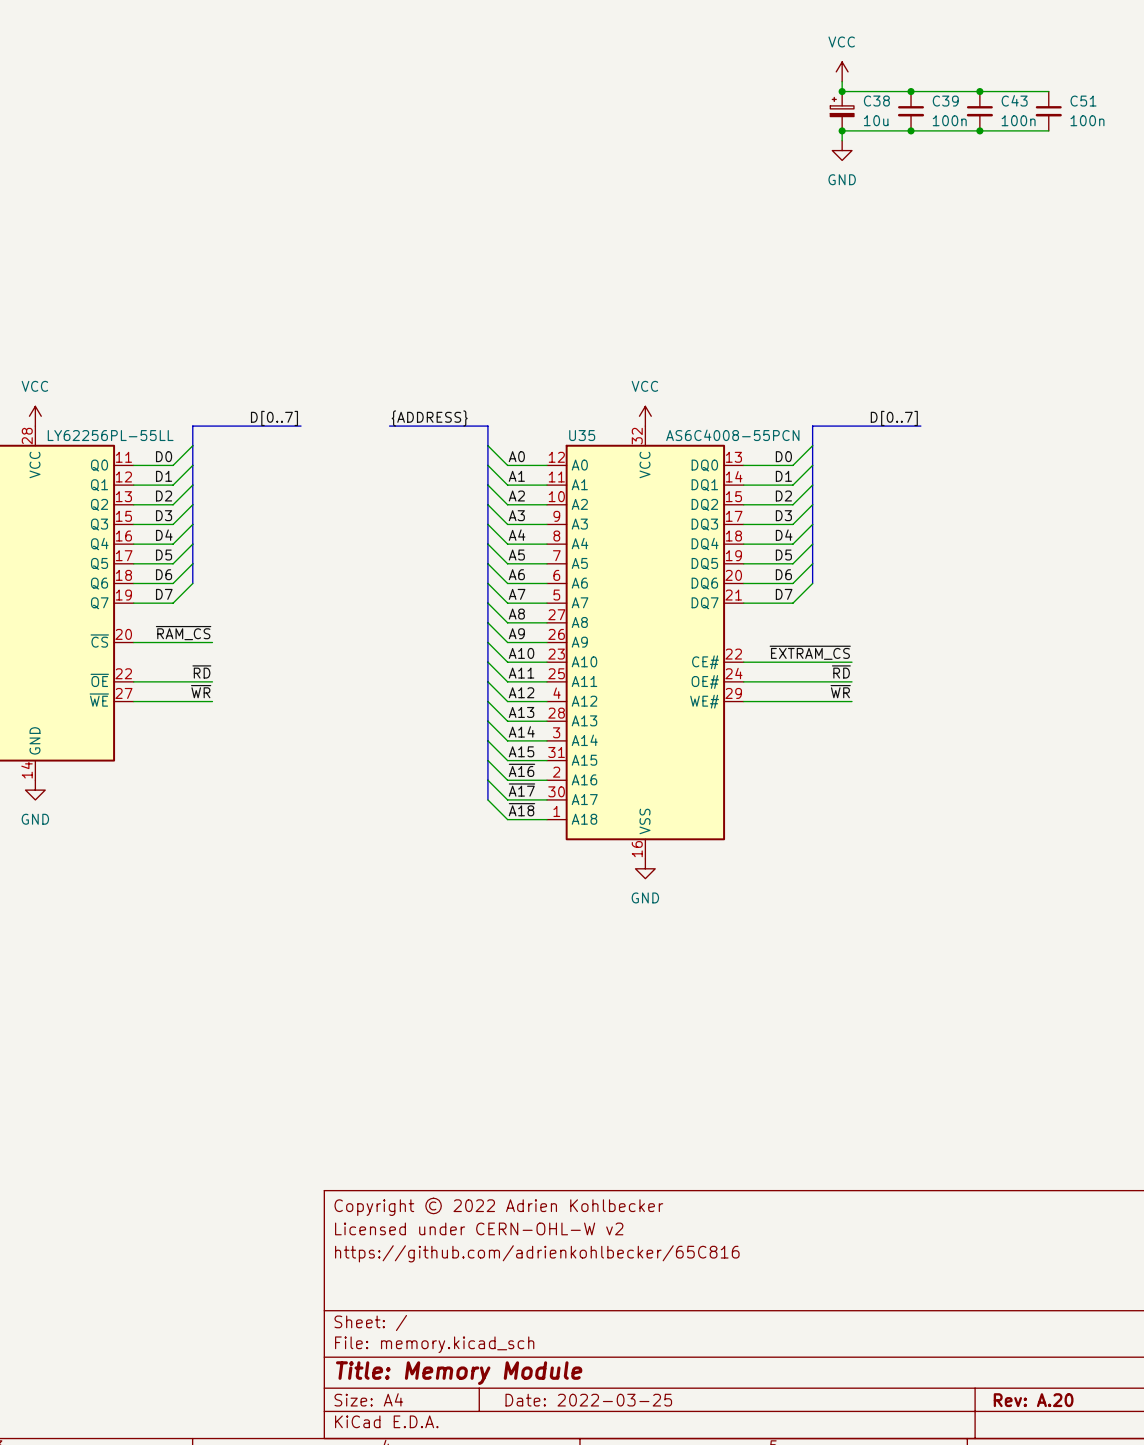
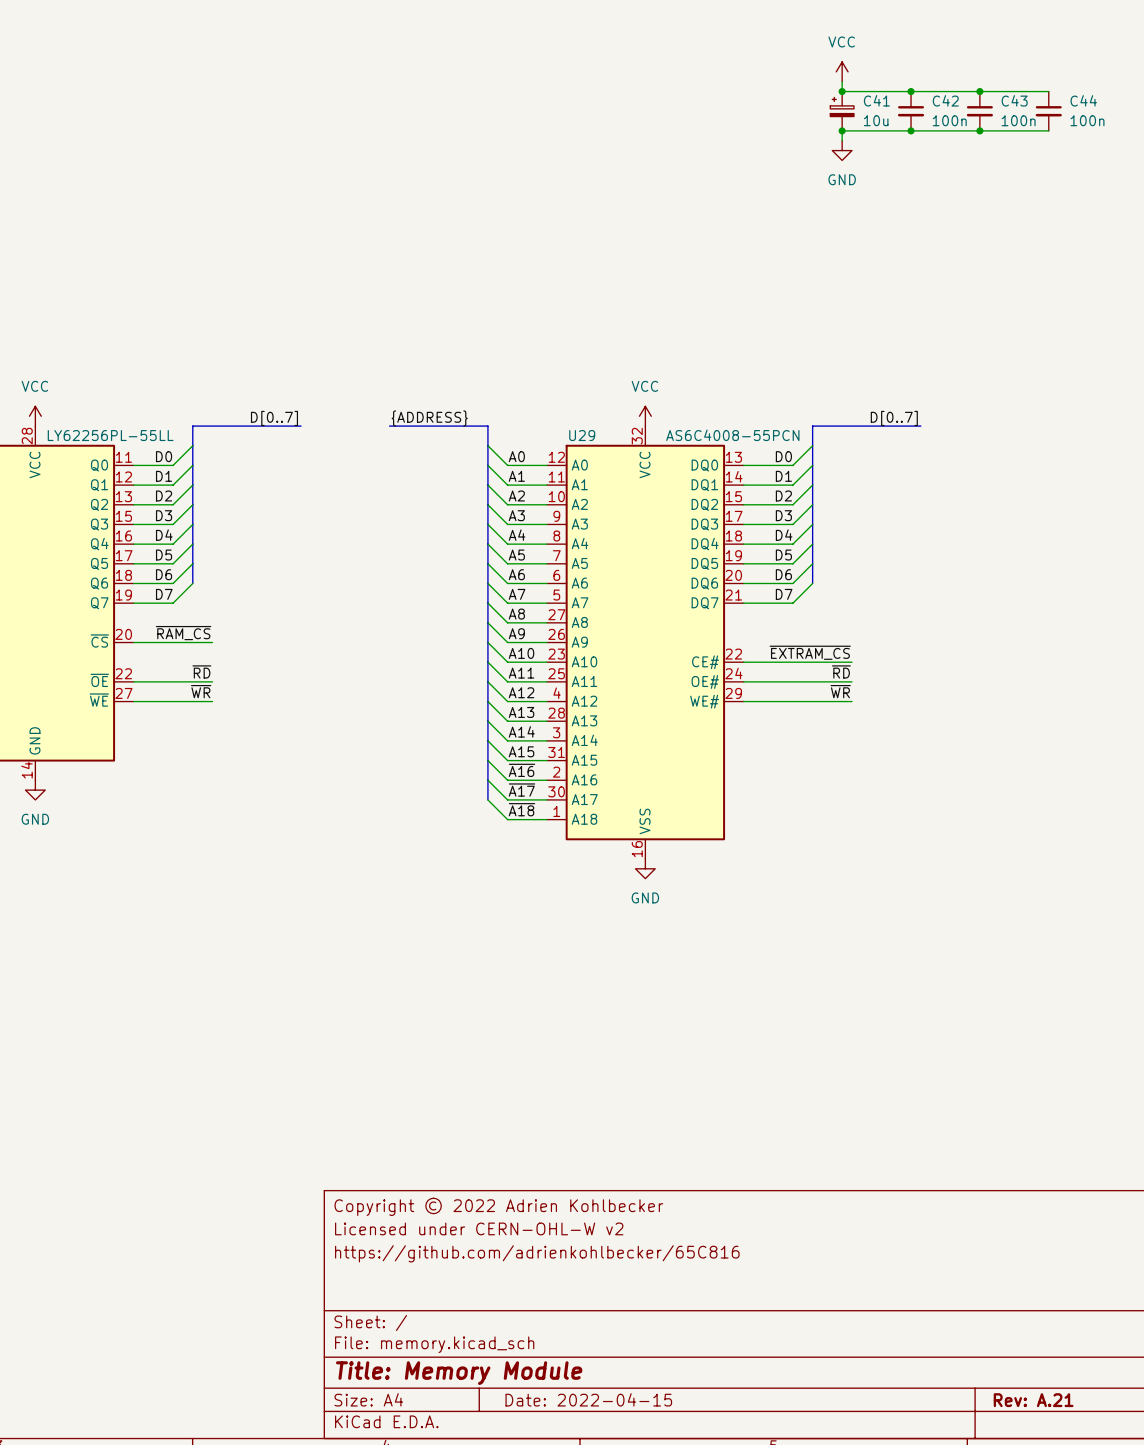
C38 name: C38 (876, 101) -> C41 (876, 100)
C39 name: C39 (945, 101) -> C42 (945, 100)
C51 name: C51 (1083, 101) -> C44 (1083, 100)
U35 name: U35 (582, 435) -> U29 (582, 435)
title block: Date: 2022-03-25 (588, 1400) -> Date: 2022-04-15 (588, 1399)
title block: Rev: A.20 (1033, 1400) -> Rev: A.21 (1033, 1400)

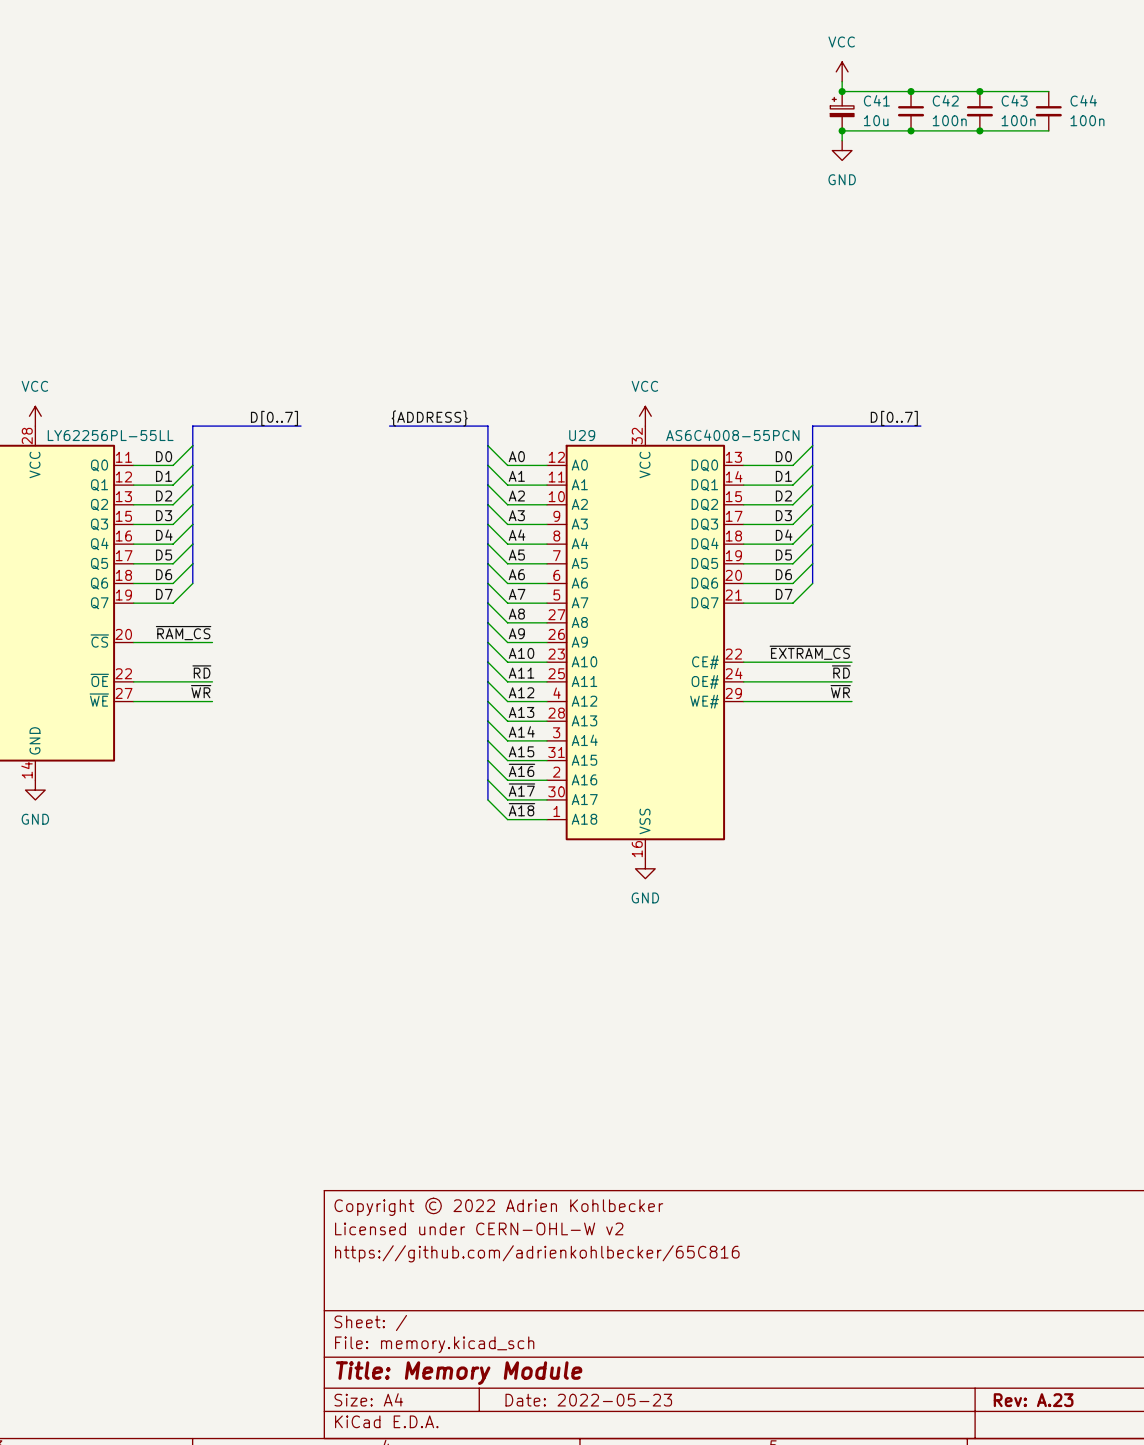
title block: Date: 2022-04-15 (588, 1399) -> Date: 2022-05-23 (588, 1400)
title block: Rev: A.21 (1033, 1400) -> Rev: A.23 (1033, 1400)

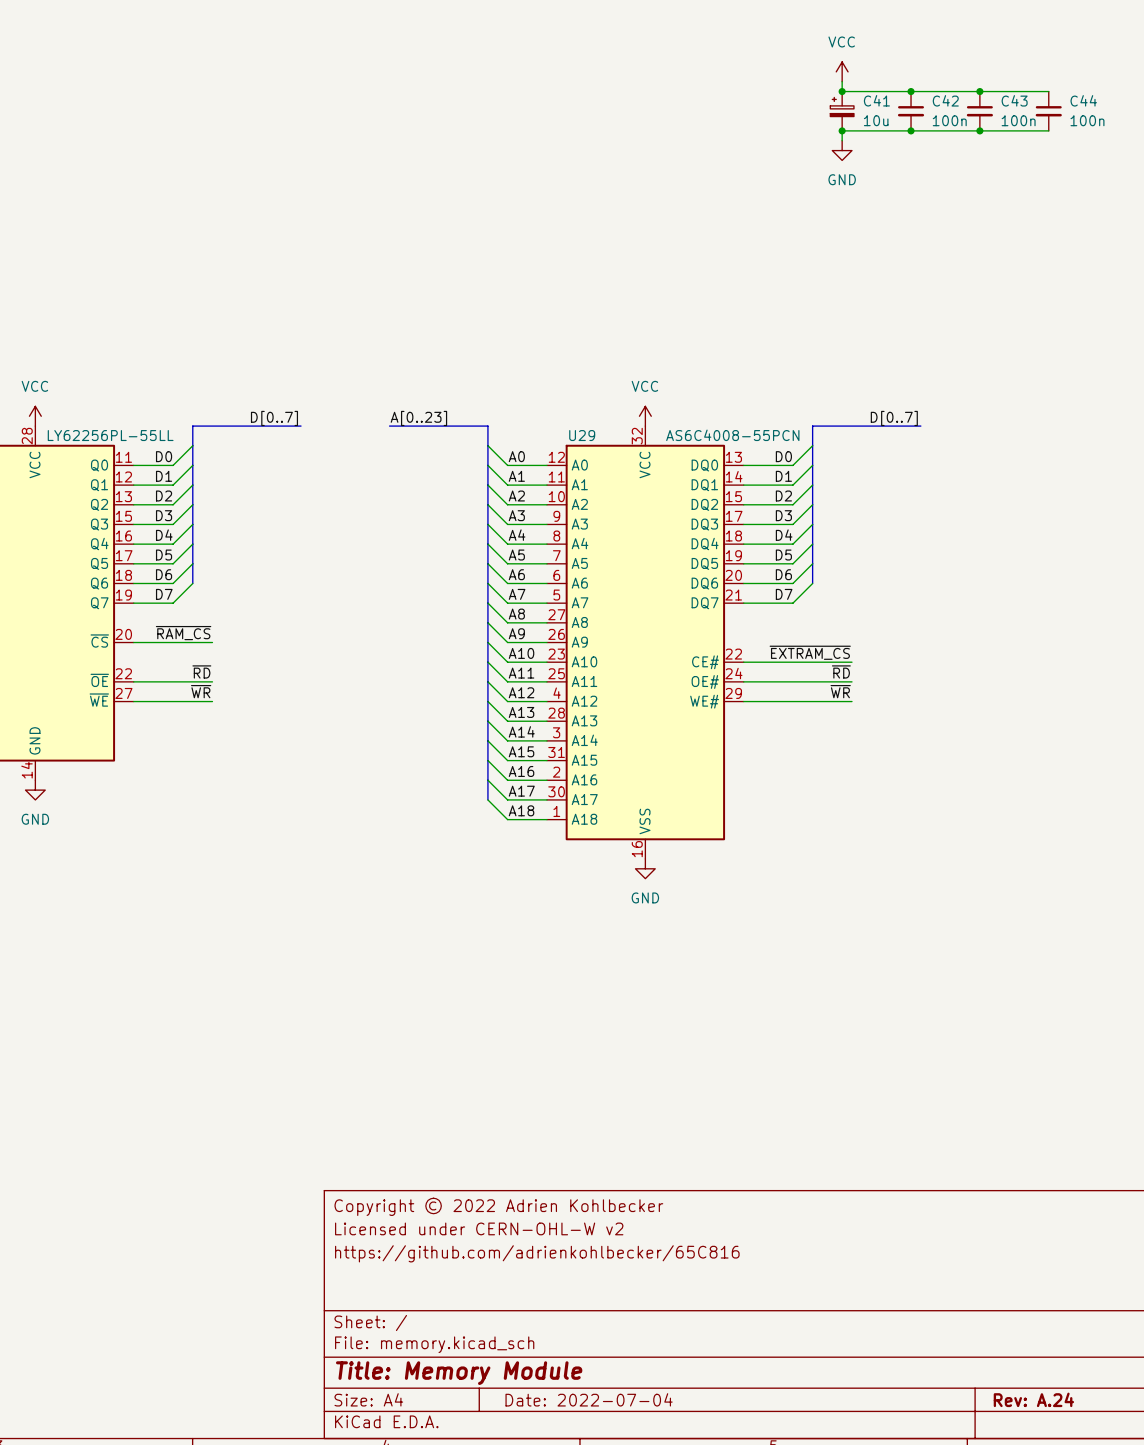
label: {ADDRESS} (429, 418) -> A[0..23] (418, 418)
label: ~{A16} (521, 770) -> A16 (521, 771)
label: ~{A17} (521, 790) -> A17 (521, 791)
label: ~{A18} (521, 809) -> A18 (521, 810)
title block: Date: 2022-05-23 (588, 1400) -> Date: 2022-07-04 (589, 1399)
title block: Rev: A.23 (1033, 1400) -> Rev: A.24 (1033, 1399)

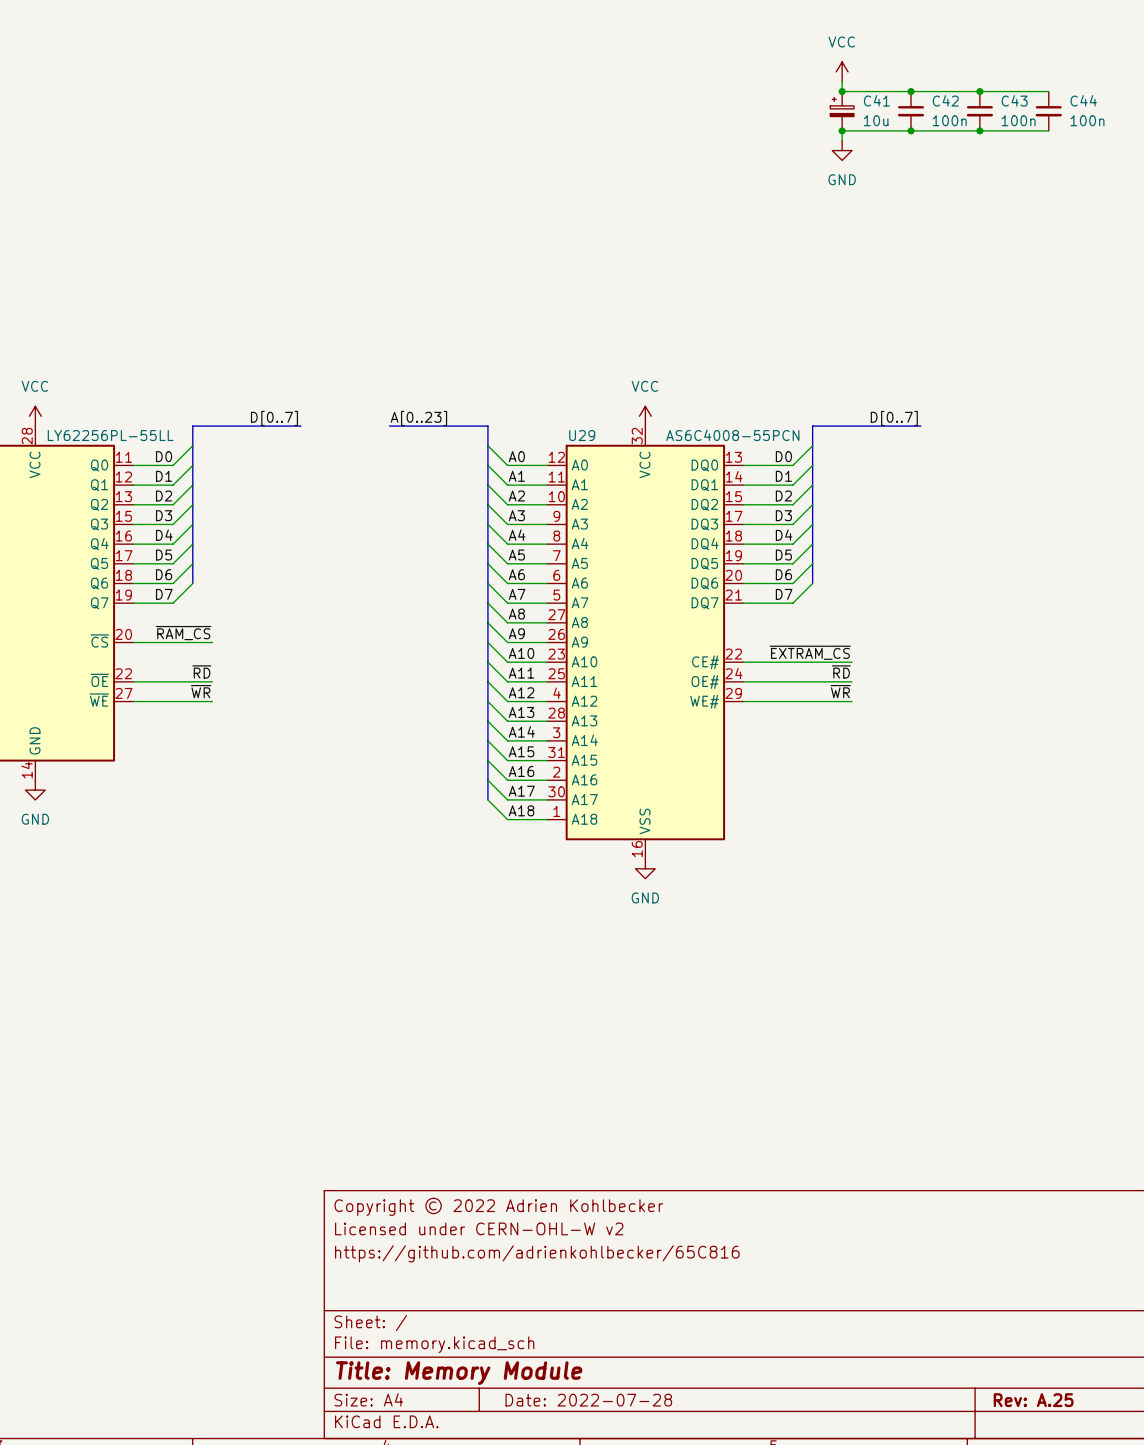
title block: Date: 2022-07-04 (589, 1399) -> Date: 2022-07-28 (588, 1400)
title block: Rev: A.24 (1033, 1399) -> Rev: A.25 (1033, 1400)

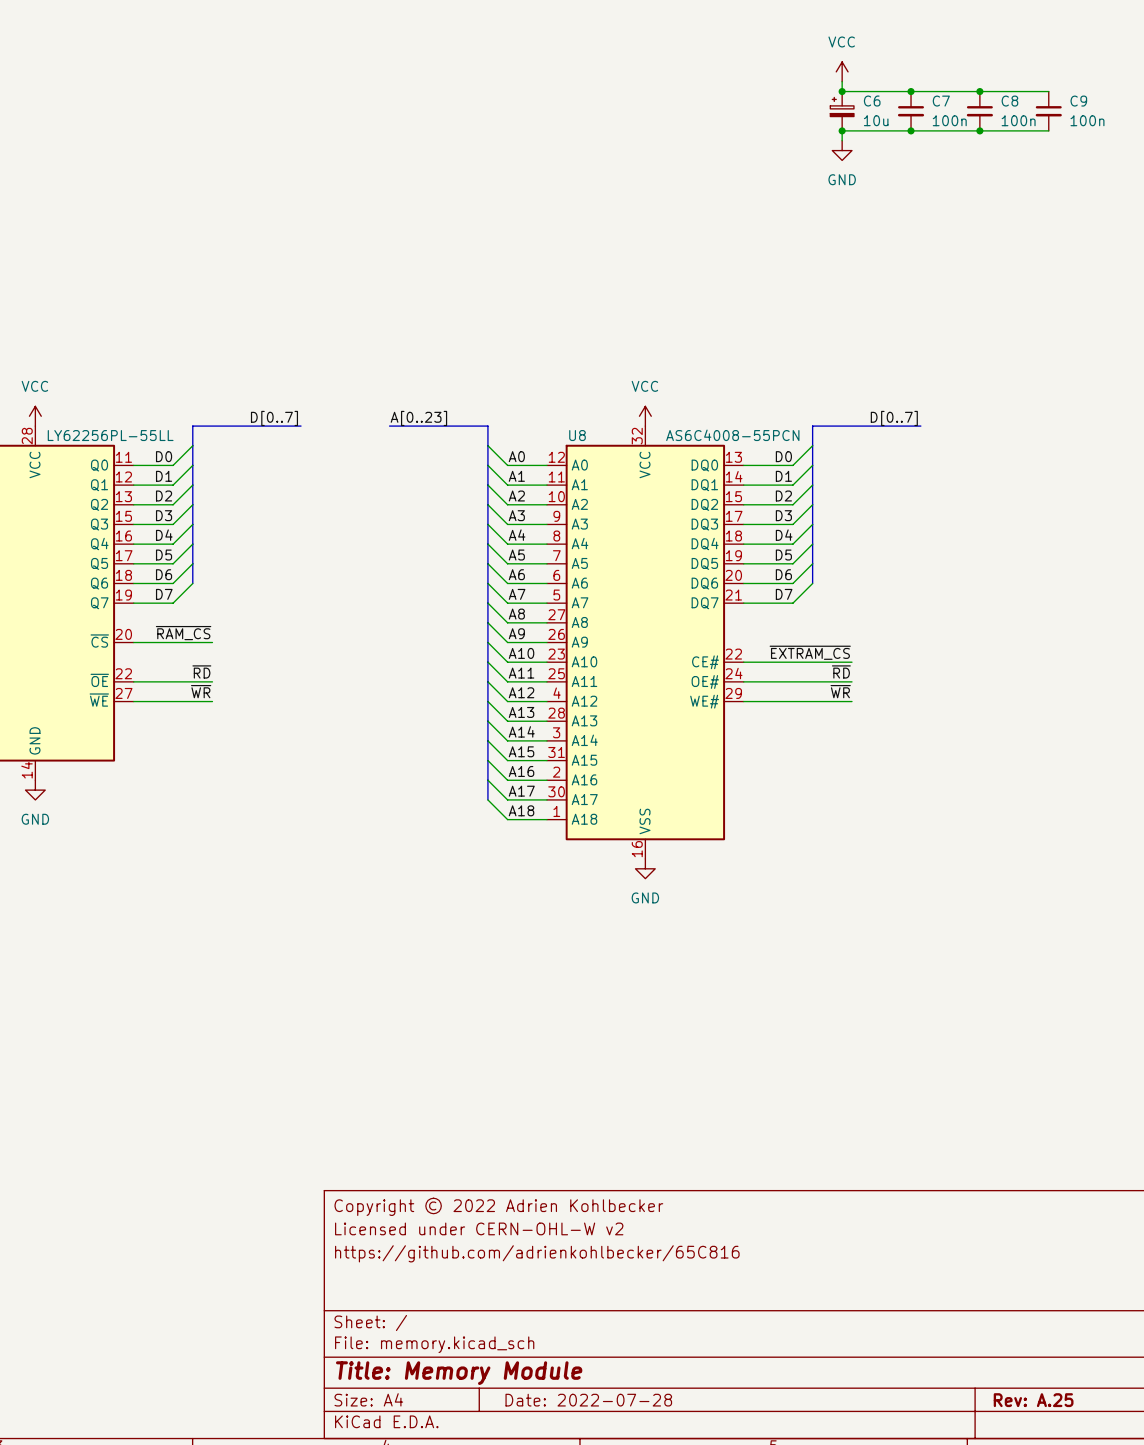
C41 name: C41 (876, 100) -> C6 (872, 101)
C42 name: C42 (945, 100) -> C7 (941, 101)
C43 name: C43 (1014, 100) -> C8 (1009, 101)
C44 name: C44 (1083, 100) -> C9 (1078, 101)
U29 name: U29 (582, 435) -> U8 (577, 435)

